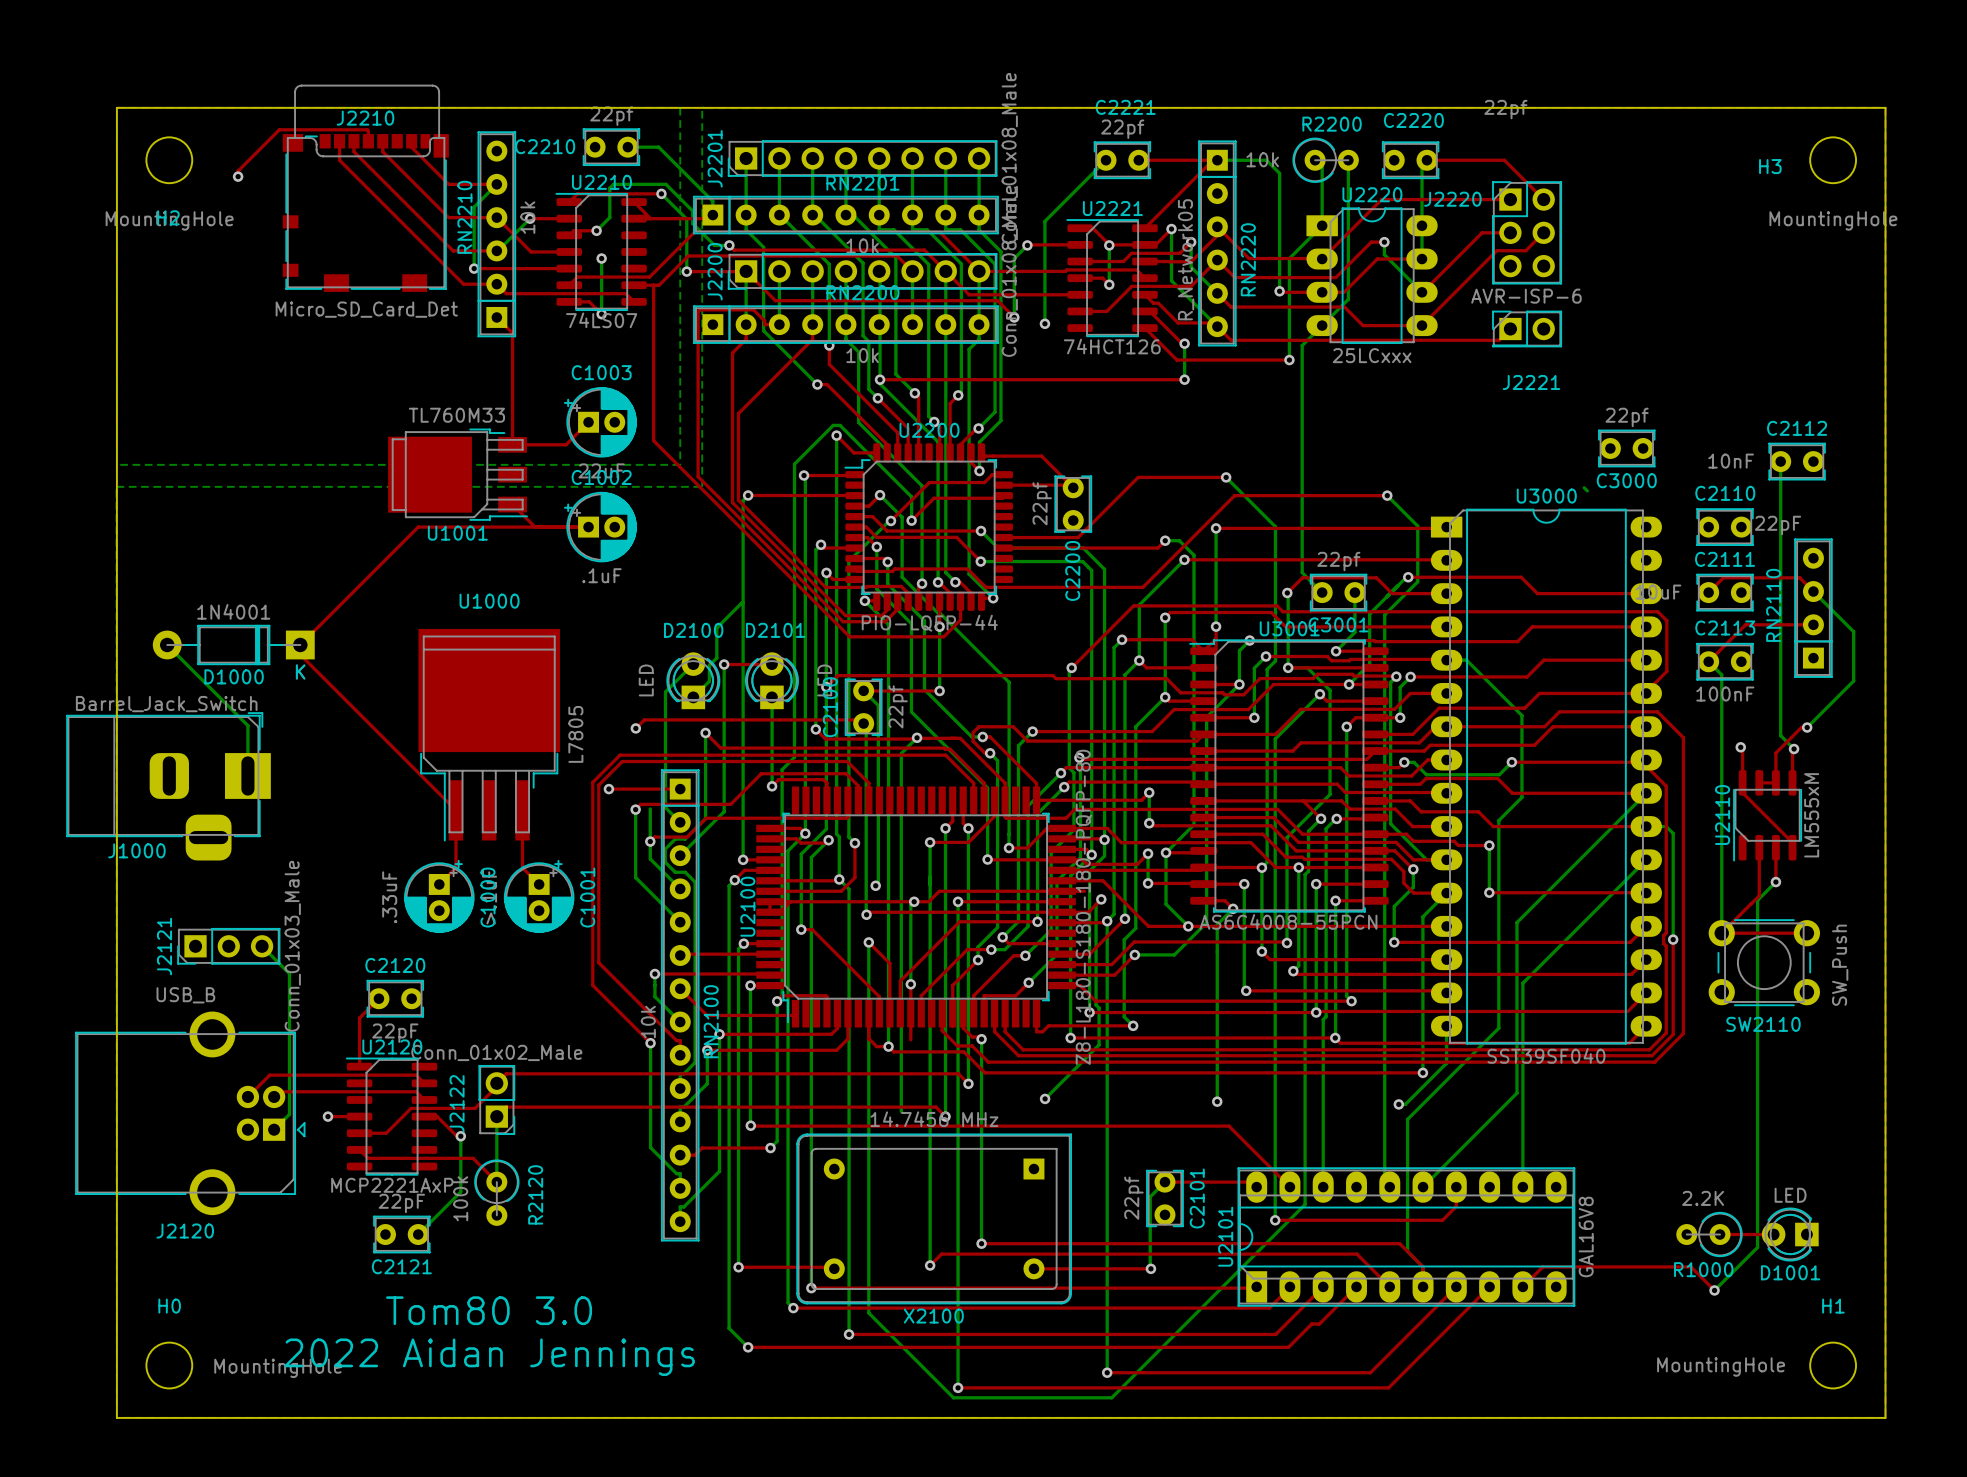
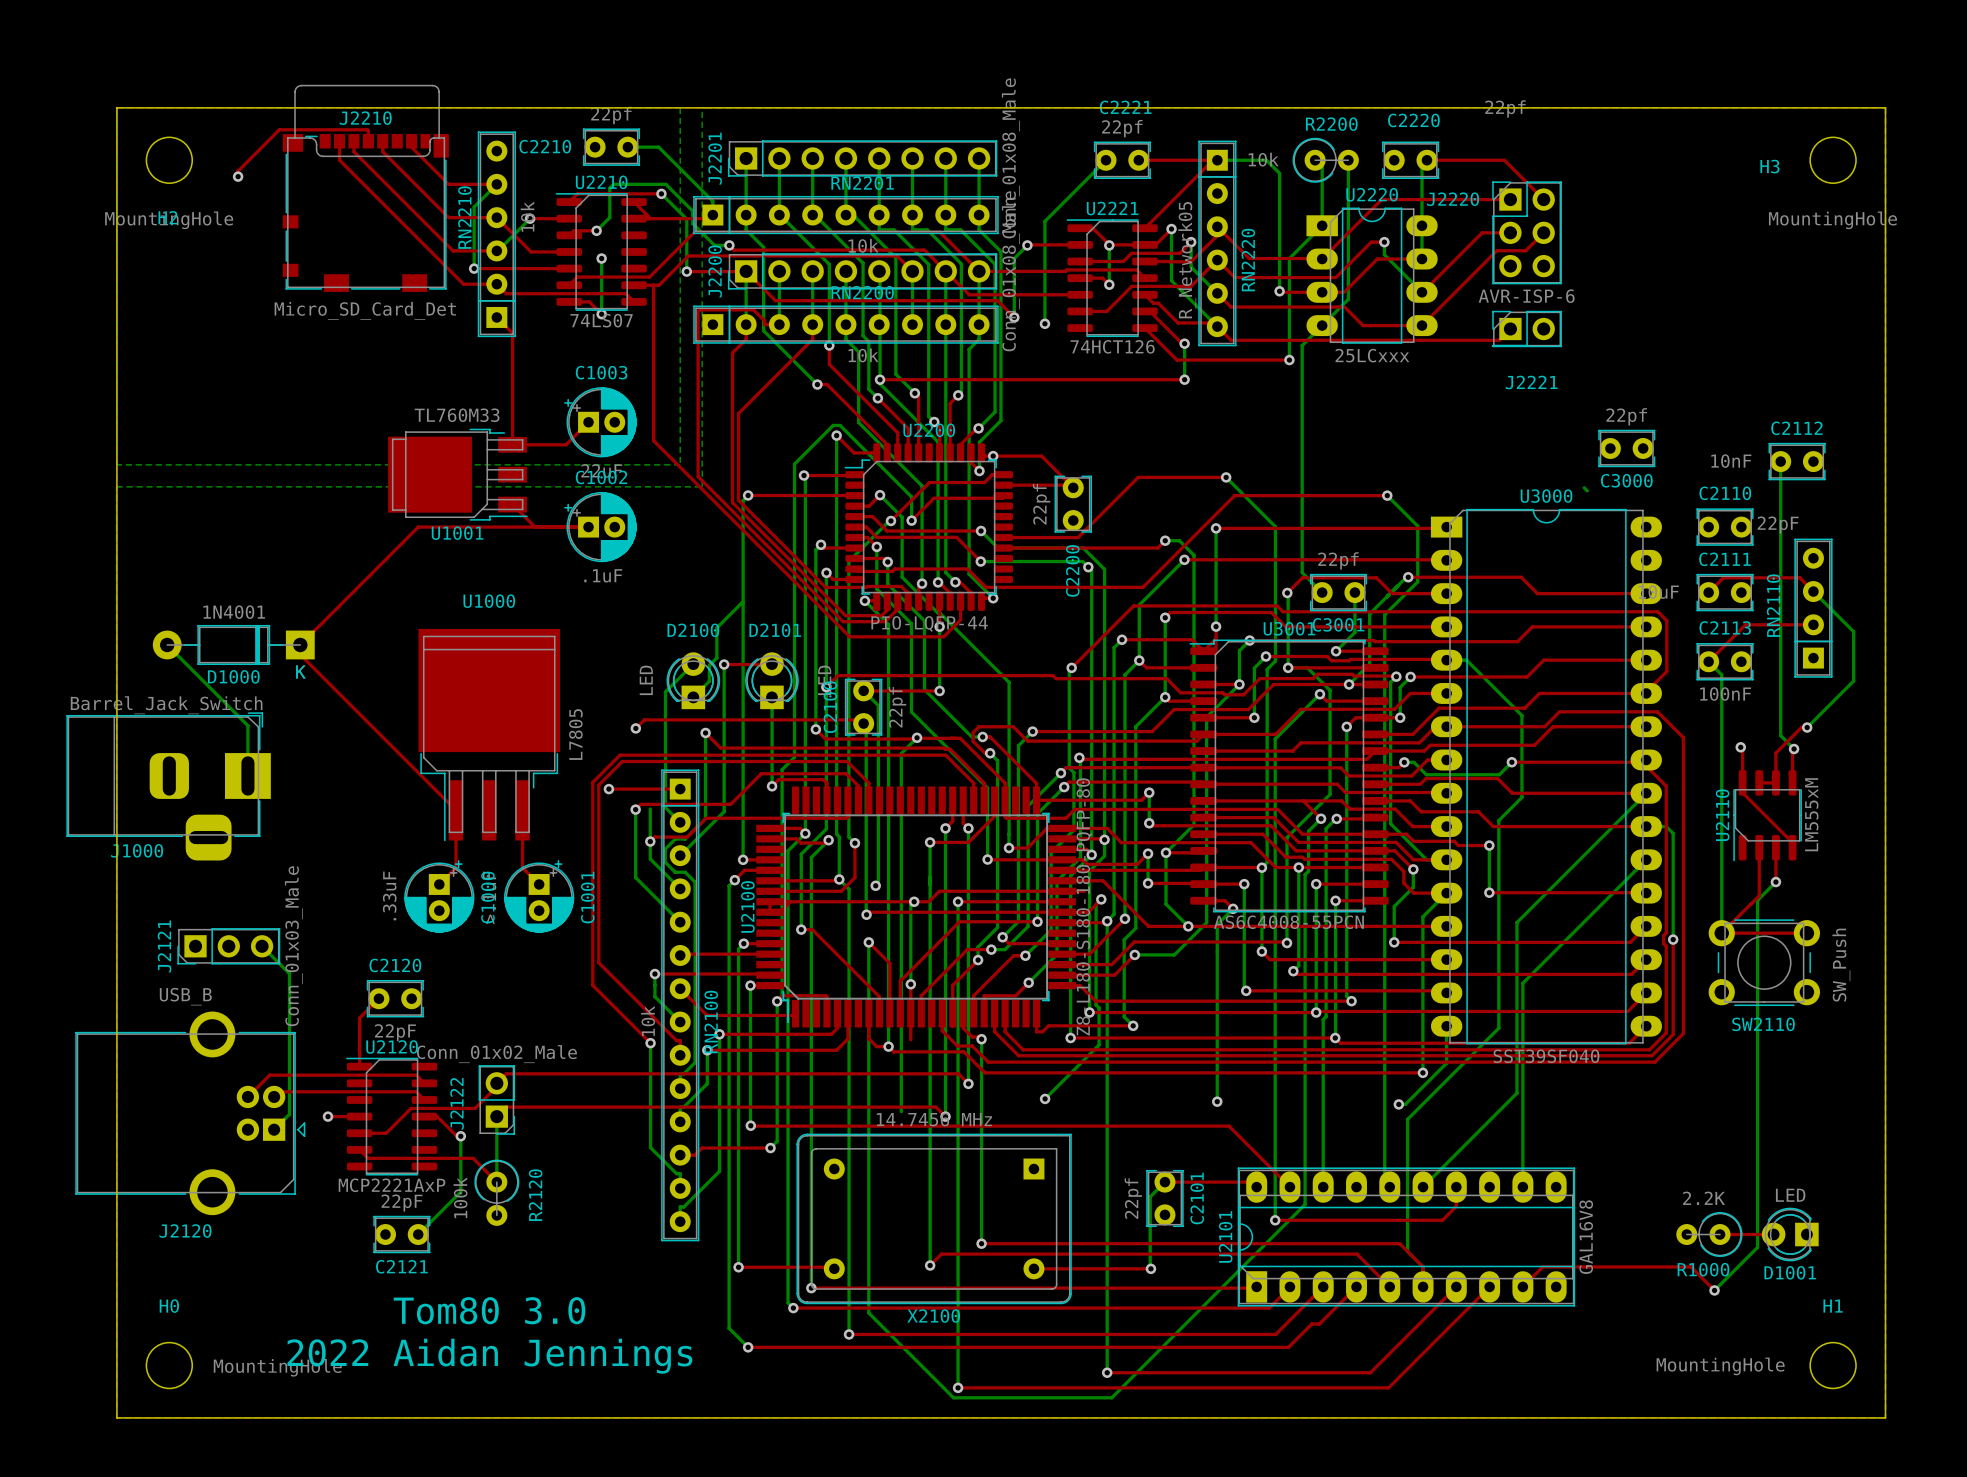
via: none -> (993, 456)
via: none -> (1088, 567)

